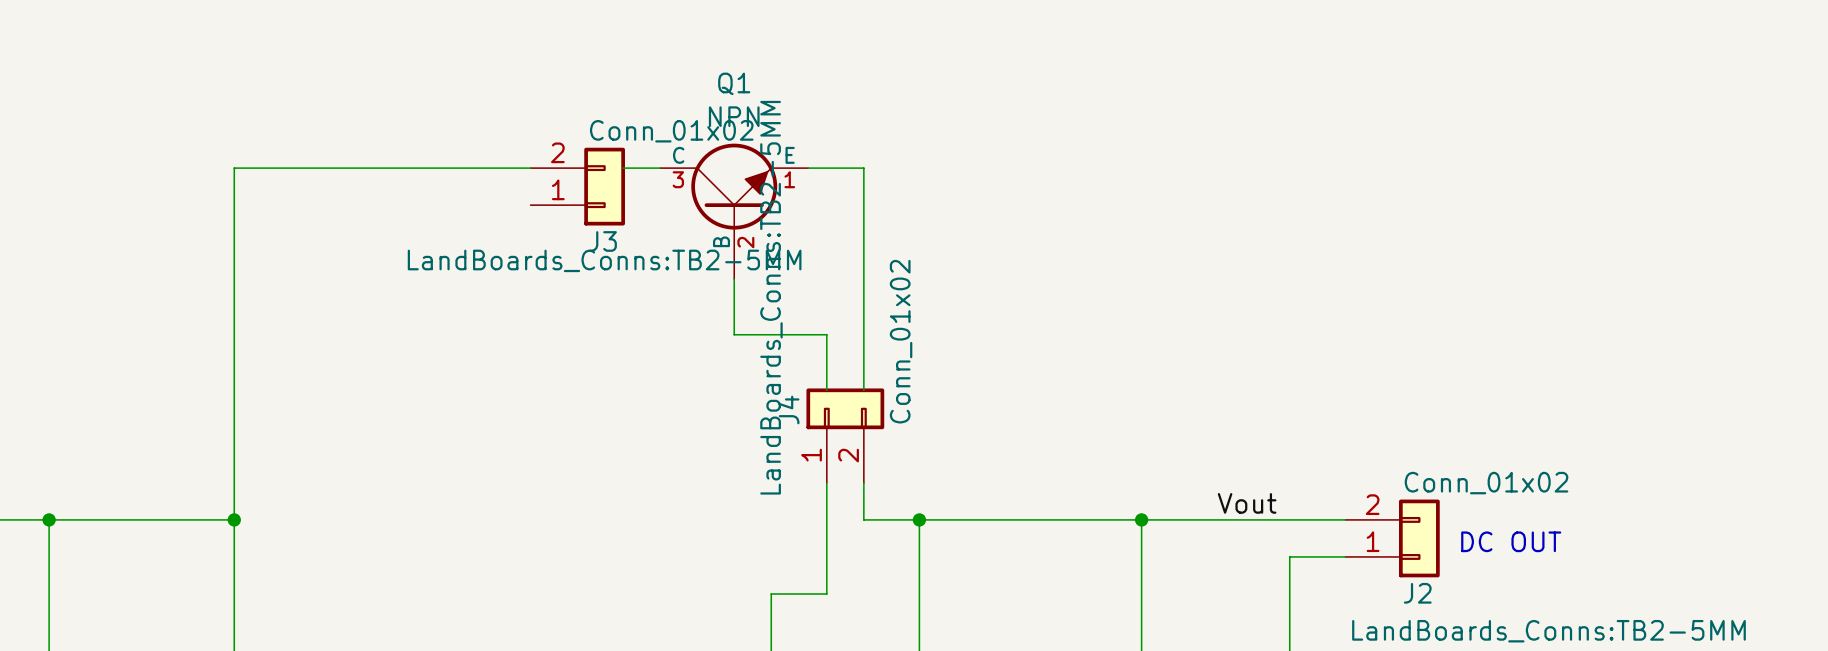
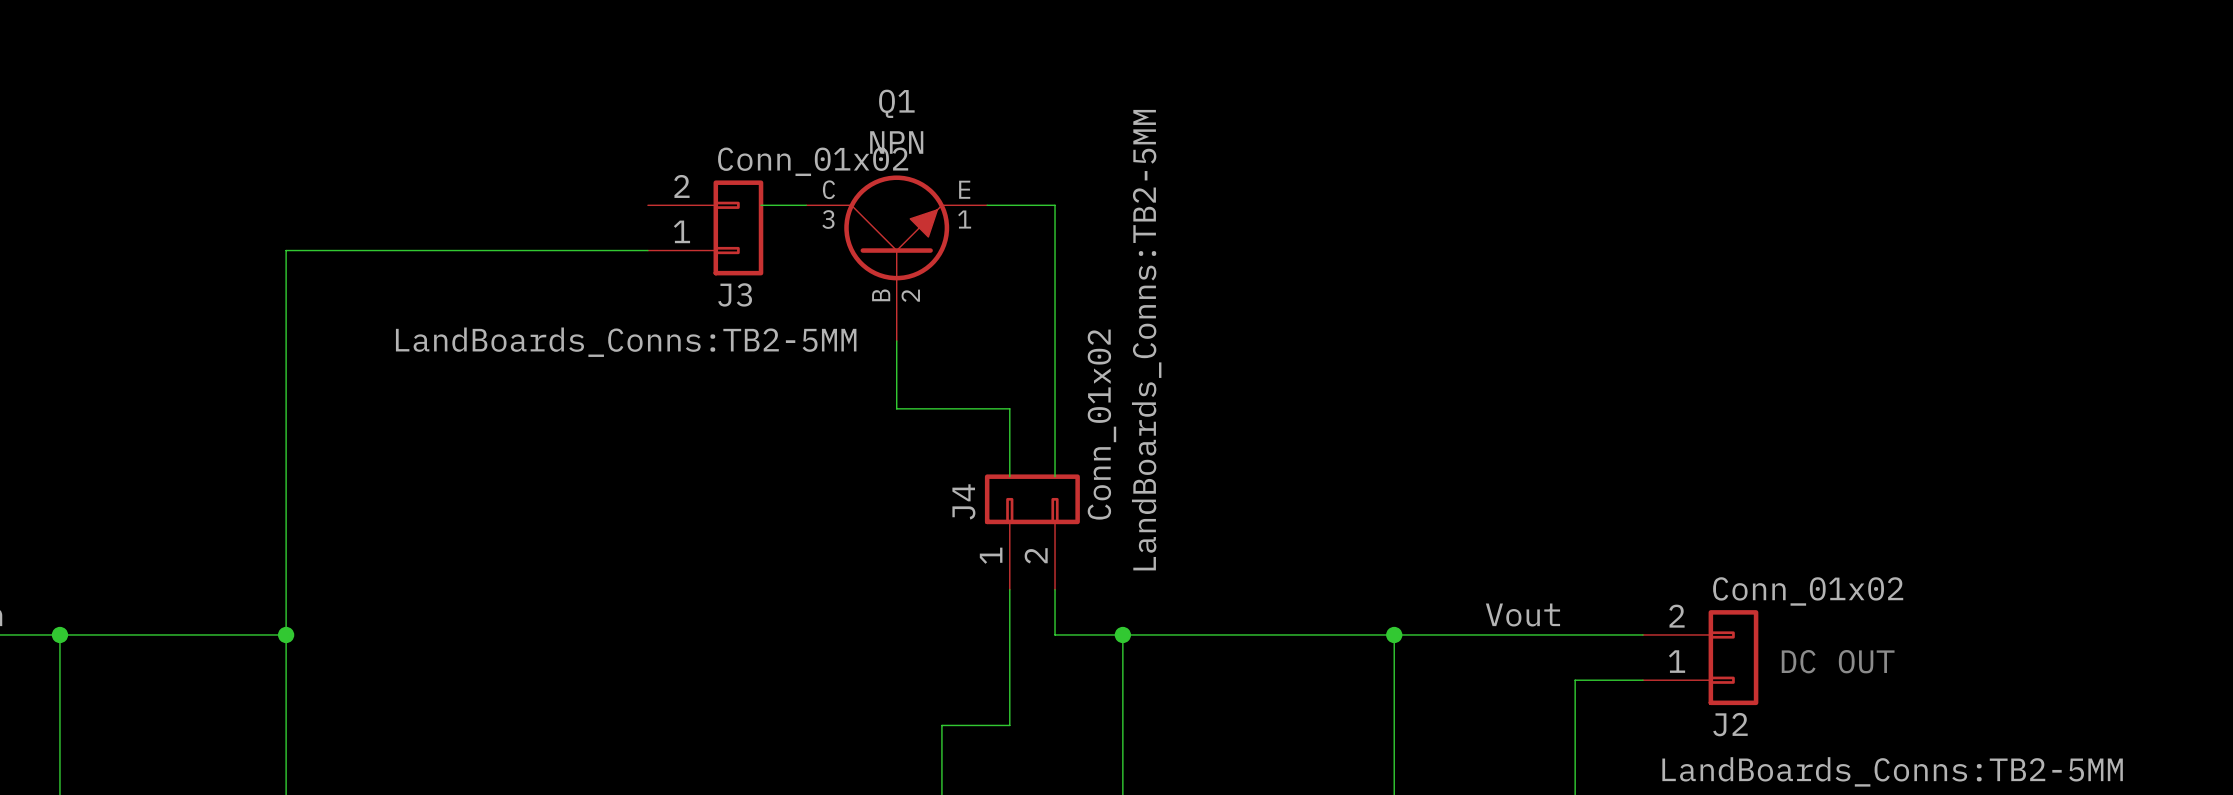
wire: (530, 168) (234, 168) (234, 205) -> (647, 250) (286, 250)
J3 text position: LandBoards_Conns:TB2-5MM (604, 260) -> LandBoards_Conns:TB2-5MM (626, 342)
J4 text position: LandBoards_Conns:TB2-5MM (771, 297) -> LandBoards_Conns:TB2-5MM (1146, 340)

